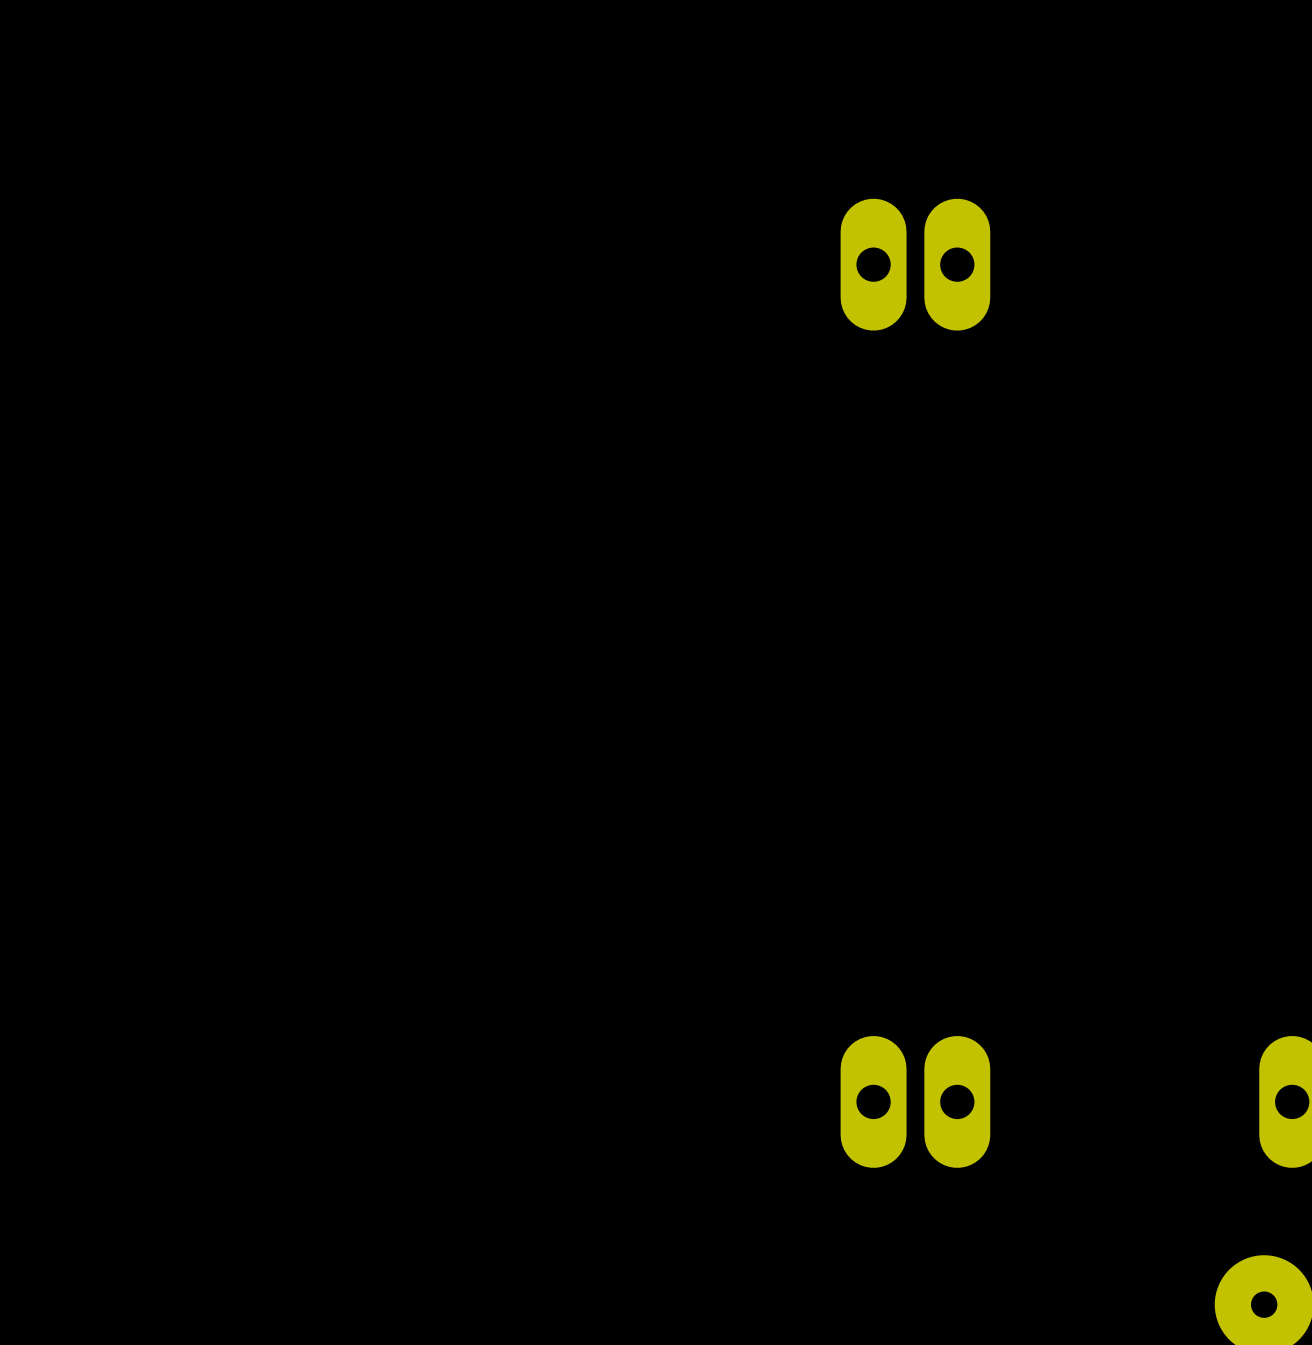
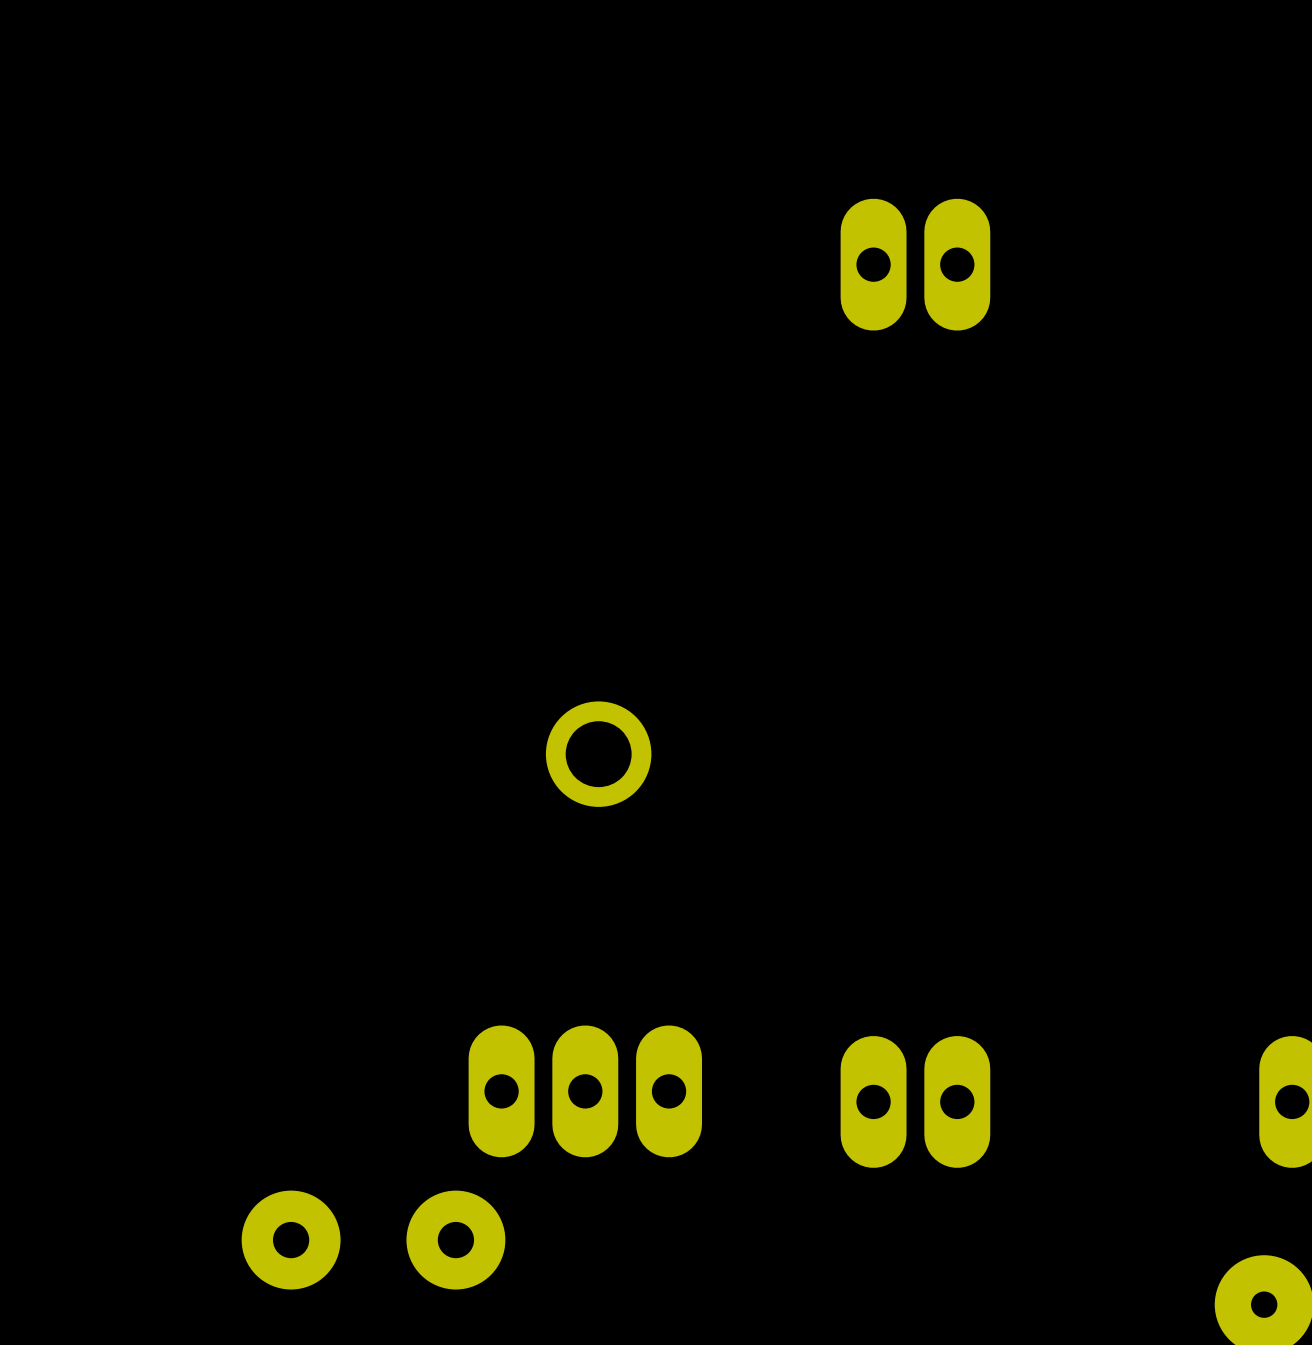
part: none -> (598, 754)
part: none -> (585, 1091)
part: none -> (373, 1240)

